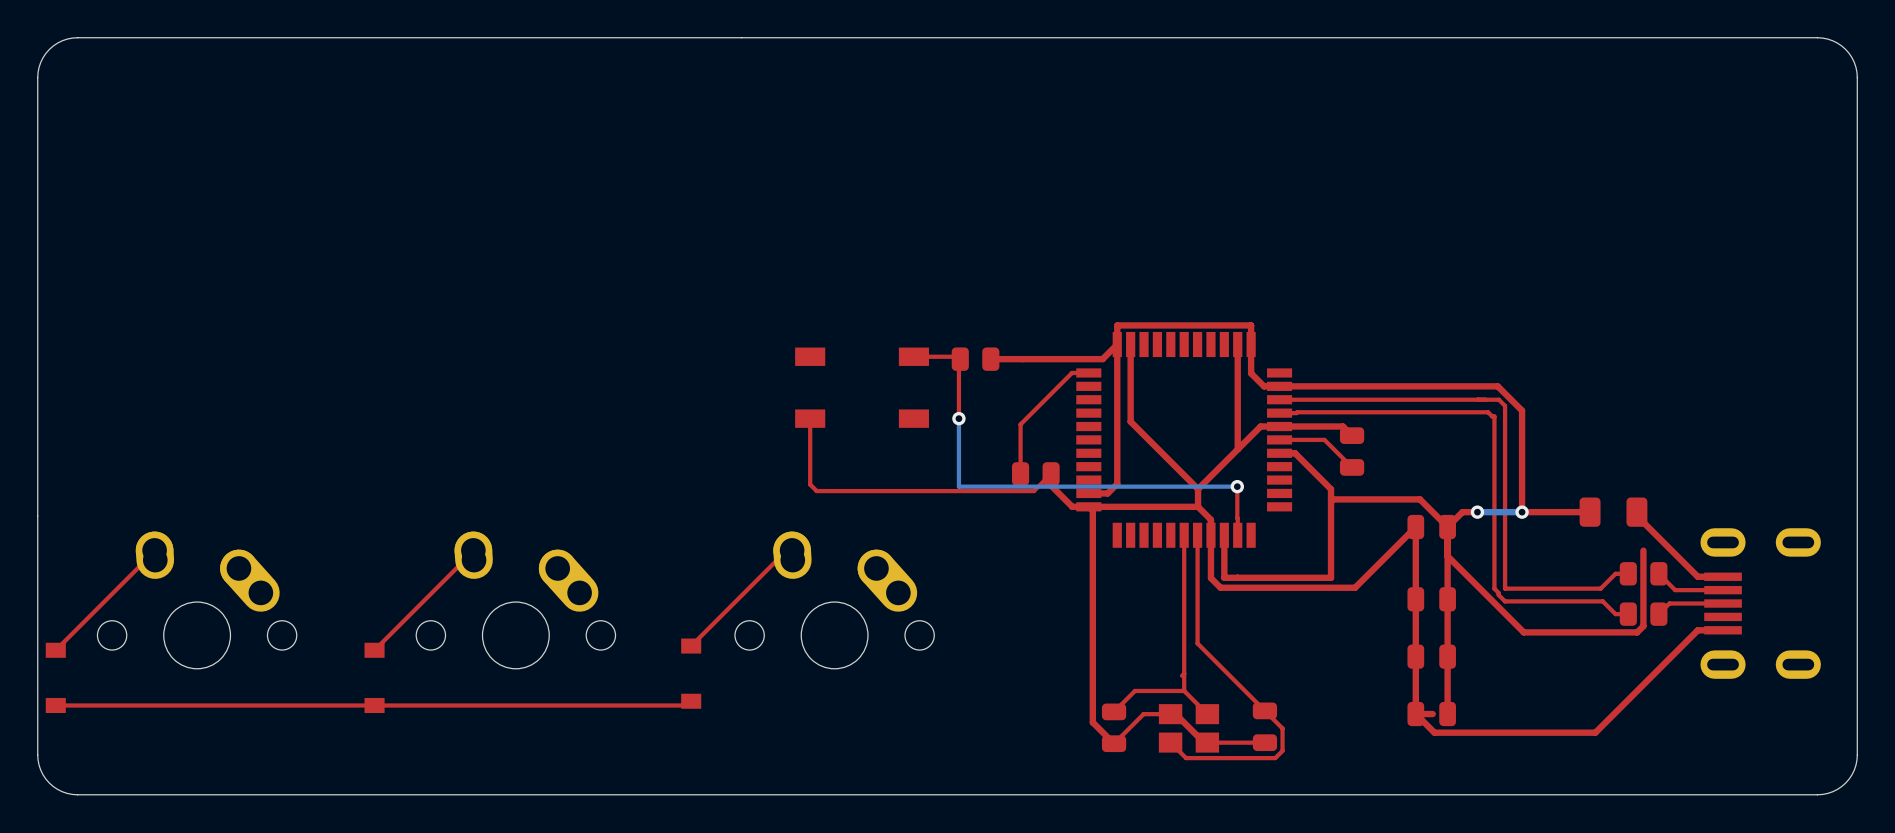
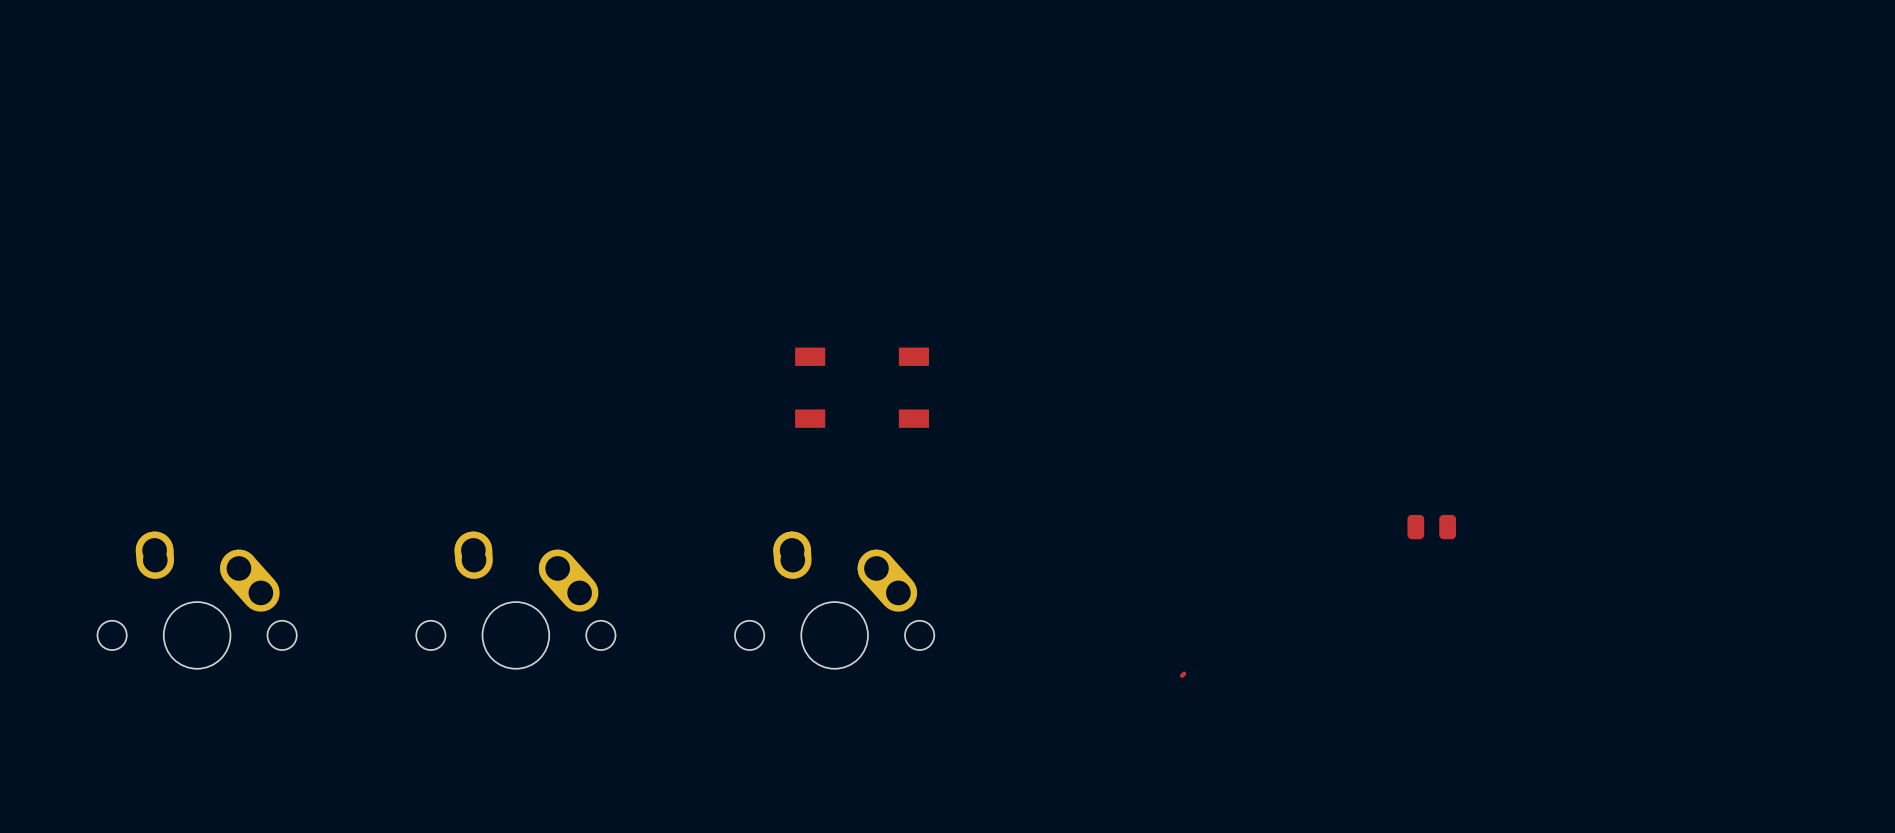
board edge: (1817, 37) (77, 37) (62, 40) (45, 53) (39, 67) (37, 77) (37, 754) (40, 770) (45, 779) (57, 789) (77, 794) (1817, 794) (1832, 791) (1849, 779) (1855, 765) (1857, 754) (1857, 77) (1854, 62) (1845, 49) (1832, 40) (1817, 37) -> none
top track: (1117, 325) (1117, 483) (1107, 493) (1088, 493) -> none
top track: (1250, 325) (1117, 325) -> none
top track: (1251, 325) (1251, 373) (1264, 386) (1497, 386) (1522, 410) (1522, 512) (1590, 512) -> none
top track: (1117, 344) (1102, 359) (990, 359) -> none
top track: (1130, 344) (1130, 421) (1198, 489) -> none
top track: (1237, 344) (1238, 449) -> none
top track: (913, 356) (957, 356) (960, 359) (958, 418) -> none
part: (975, 359) -> none
top track: (1088, 372) (1072, 372) (1020, 424) (1020, 473) -> none
top track: (1279, 399) (1498, 399) (1505, 405) (1505, 588) (1600, 588) (1615, 573) (1628, 573) -> none
top track: (1279, 413) (1488, 412) (1494, 416) (1494, 588) (1498, 595) (1505, 601) (1602, 601) (1615, 614) (1628, 614) -> none
top track: (810, 418) (810, 484) (816, 491) (1033, 491) (1051, 473) (1051, 485) (1072, 506) (1198, 506) -> none
bottom track: (958, 418) (958, 486) (1237, 486) -> none
via: (958, 418) -> none
top track: (1352, 435) (1342, 426) (1260, 426) (1198, 489) -> none
part: (1184, 439) -> none
top track: (1279, 439) (1324, 439) (1352, 467) -> none
part: (1352, 451) -> none
top track: (1279, 453) (1295, 453) (1331, 489) (1331, 577) (1224, 577) (1224, 535) -> none
part: (1035, 473) -> none
top track: (1237, 486) (1237, 535) -> none
via: (1237, 486) -> none
top track: (1198, 489) (1198, 506) -> none
top track: (1331, 501) (1332, 499) (1419, 499) (1447, 527) -> none
top track: (1088, 506) (1092, 510) (1092, 722) (1114, 743) (1143, 714) (1175, 714) (1204, 742) (1207, 742) -> none
top track: (1198, 506) (1210, 519) (1210, 578) (1220, 587) (1355, 587) (1415, 527) (1415, 714) -> none
top track: (1477, 512) (1462, 512) (1447, 527) -> none
via: (1477, 512) -> none
bottom track: (1522, 512) (1477, 512) -> none
via: (1522, 512) -> none
part: (1613, 512) -> none
top track: (1636, 512) (1636, 515) (1697, 576) (1723, 576) -> none
top track: (1447, 527) (1447, 714) -> none
top track: (1184, 535) (1184, 690) -> none
top track: (1197, 535) (1197, 643) (1282, 728) (1282, 750) (1275, 758) (1186, 758) (1170, 742) (1168, 744) -> none
top track: (1643, 550) (1643, 626) (1637, 632) (1523, 632) (1447, 556) -> none
top track: (155, 560) (145, 560) (55, 650) -> none
top track: (474, 560) (464, 560) (374, 650) -> none
top track: (792, 560) (777, 560) (691, 646) -> none
part: (1643, 573) -> none
top track: (1658, 573) (1675, 590) (1723, 590) -> none
part: (1431, 599) -> none
top track: (1723, 603) (1669, 603) (1658, 614) -> none
part: (1760, 603) -> none
part: (1643, 614) -> none
top track: (1723, 630) (1697, 630) (1595, 732) (1434, 732) (1415, 714) -> none
part: (1431, 656) -> none
part: (691, 673) -> none
part: (55, 677) -> none
part: (374, 677) -> none
top track: (1184, 690) (1207, 714) (1210, 710) -> none
top track: (1184, 690) (1135, 690) (1114, 711) -> none
top track: (691, 701) (686, 705) (55, 705) -> none
part: (1431, 714) -> none
top track: (1432, 714) (1415, 714) -> none
part: (1264, 726) -> none
part: (1114, 727) -> none
part: (1188, 728) -> none
top track: (1264, 742) (1207, 742) -> none

